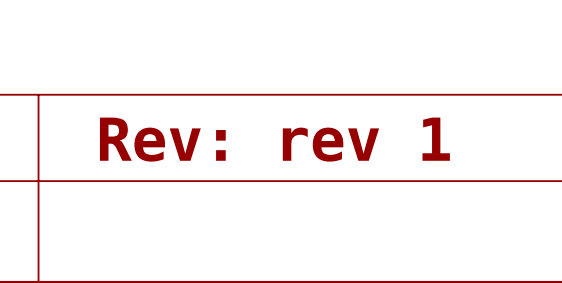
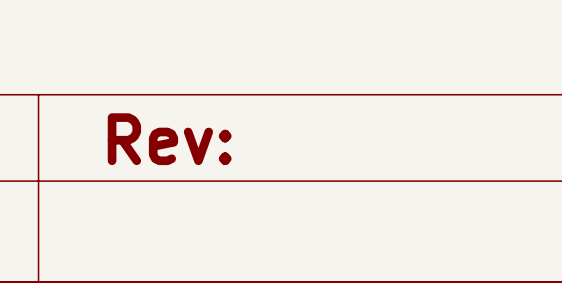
title block: Rev: rev 1 (274, 139) -> Rev: (169, 139)

